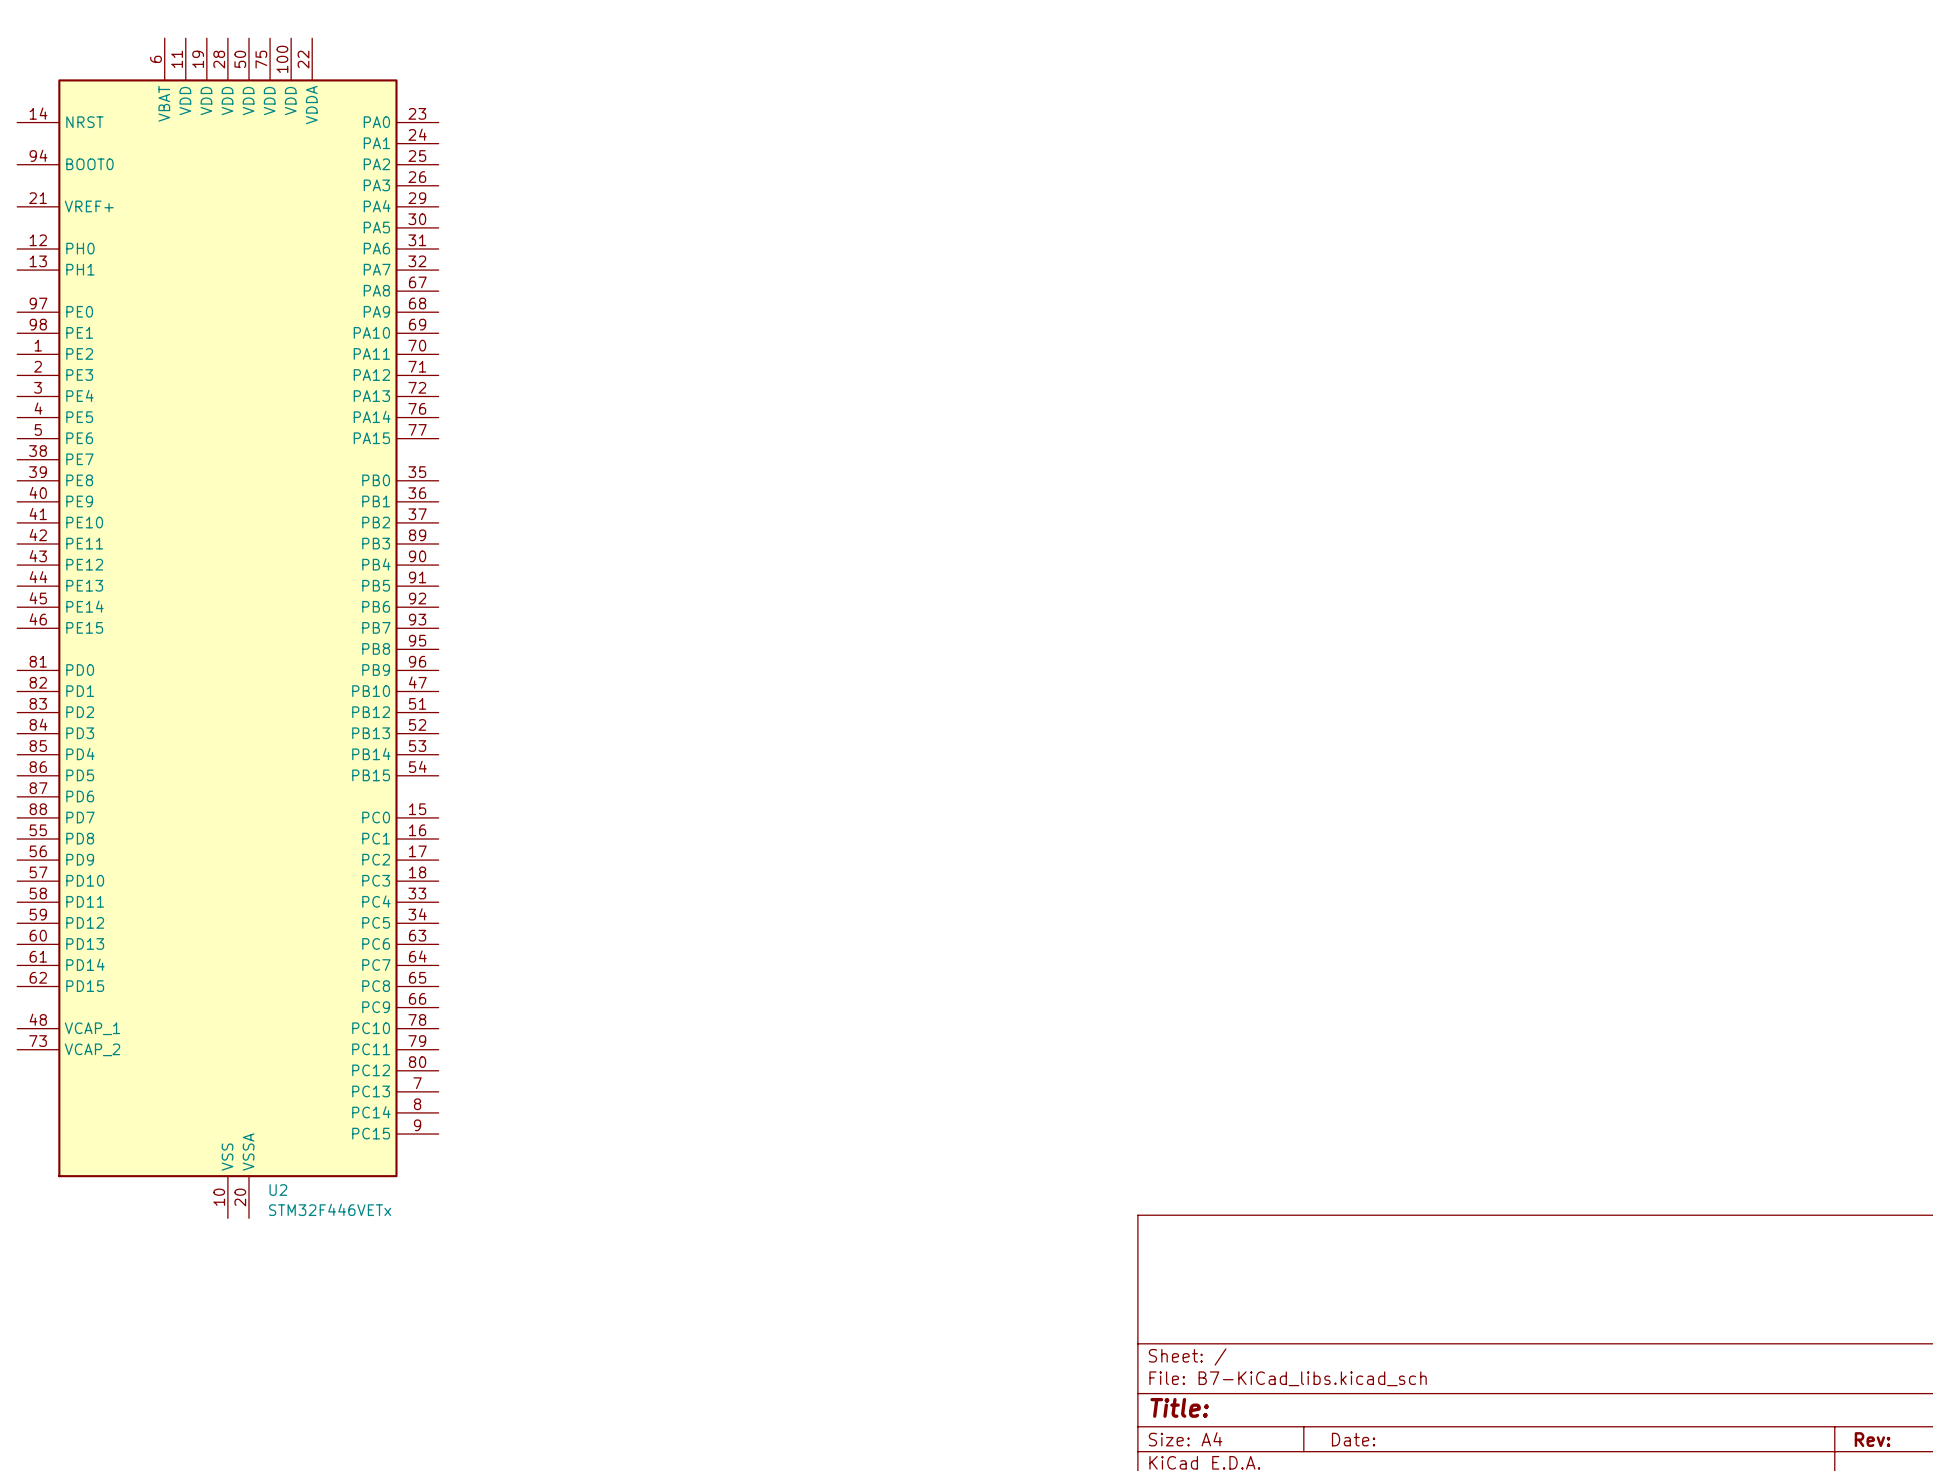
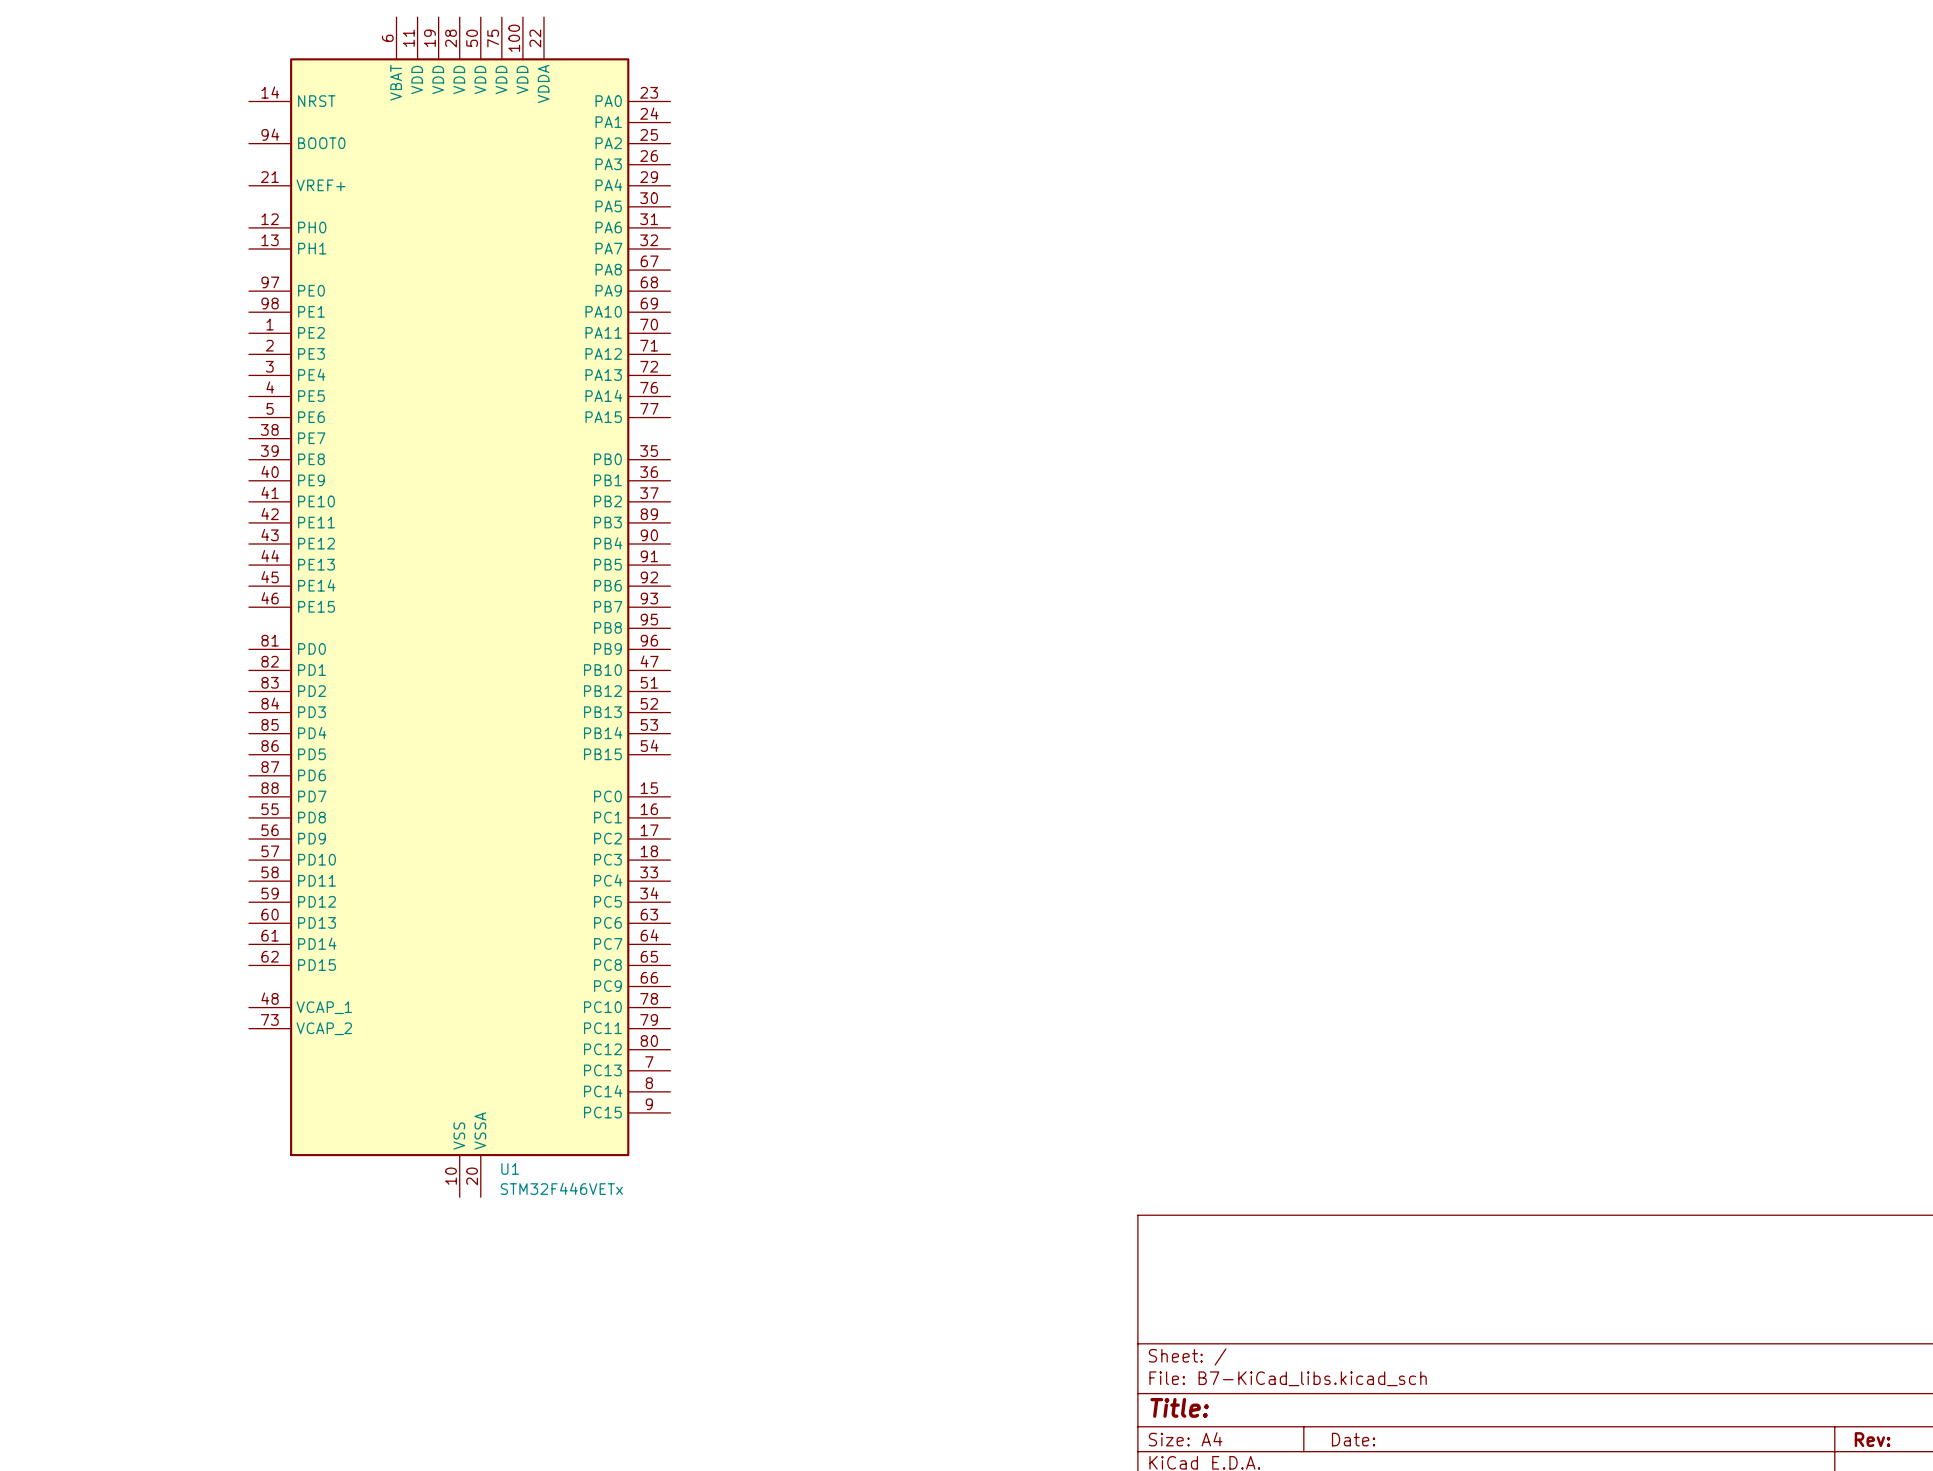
U1: none -> STM32F446VETx (459, 607)
U2: STM32F446VETx (227, 628) -> none

